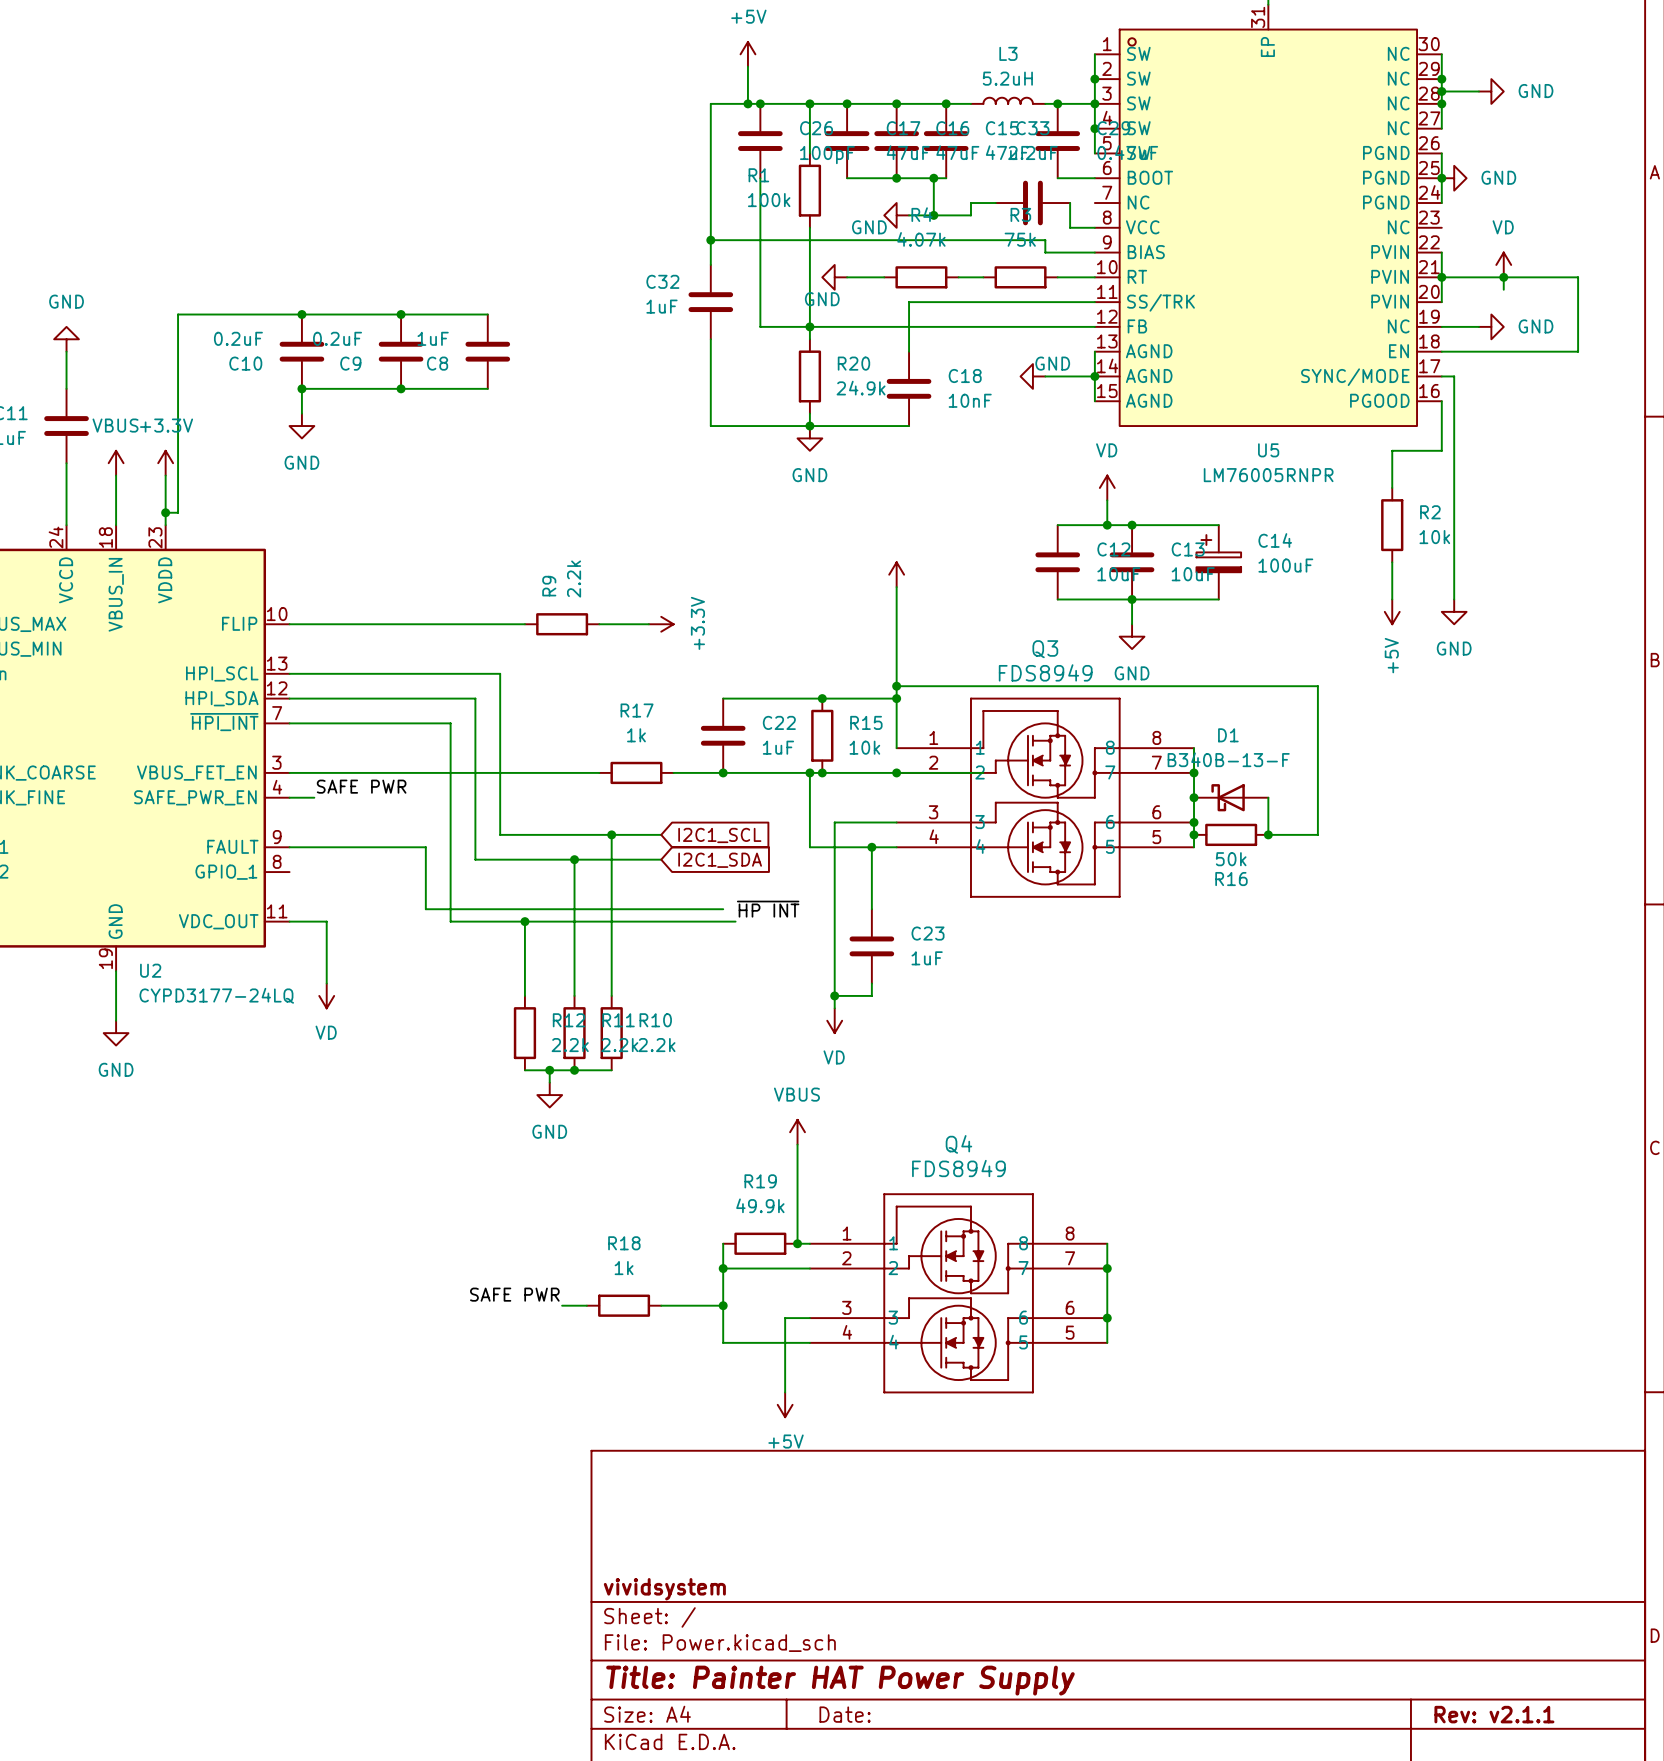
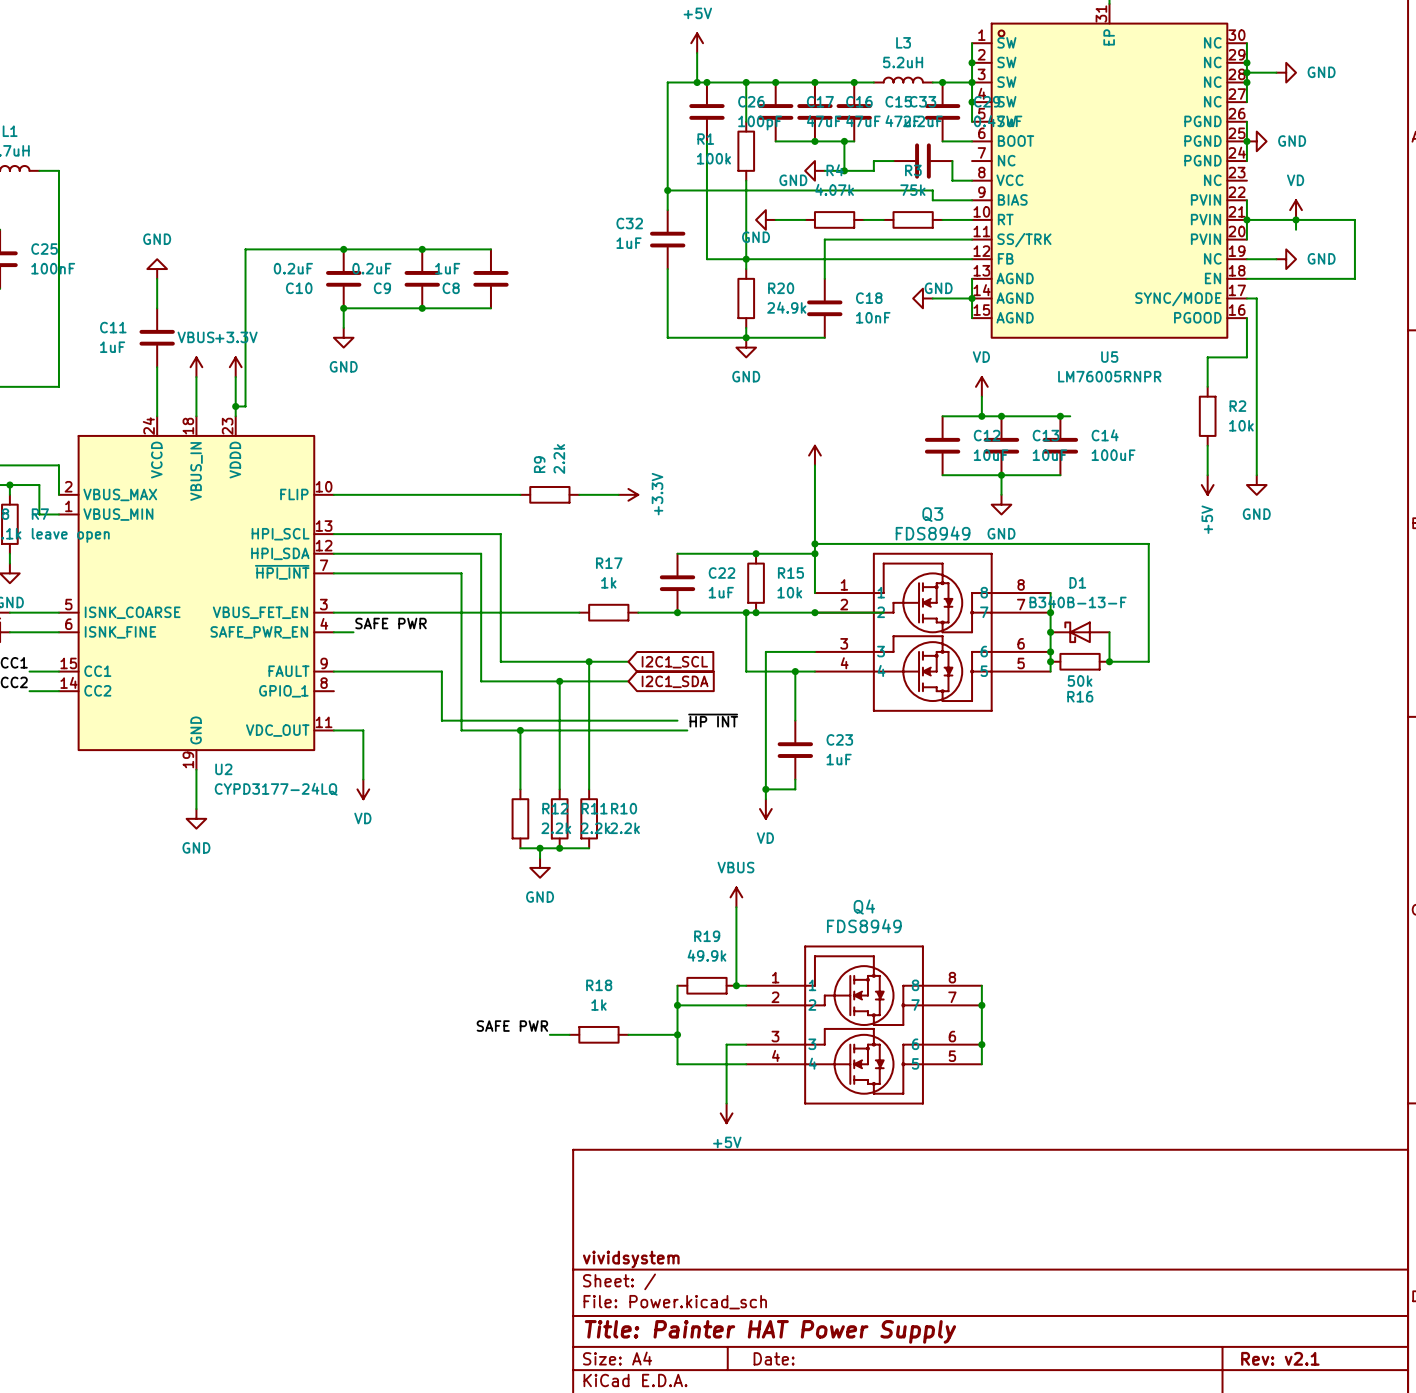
C14 symbol: [1196, 525, 1242, 600] -> [1042, 416, 1079, 476]
junction: none -> (1060, 416)
wire: (1206, 599) (1218, 599) -> none
title block: Rev: v2.1.1 (1494, 1714) -> Rev: v2.1 (1280, 1358)

